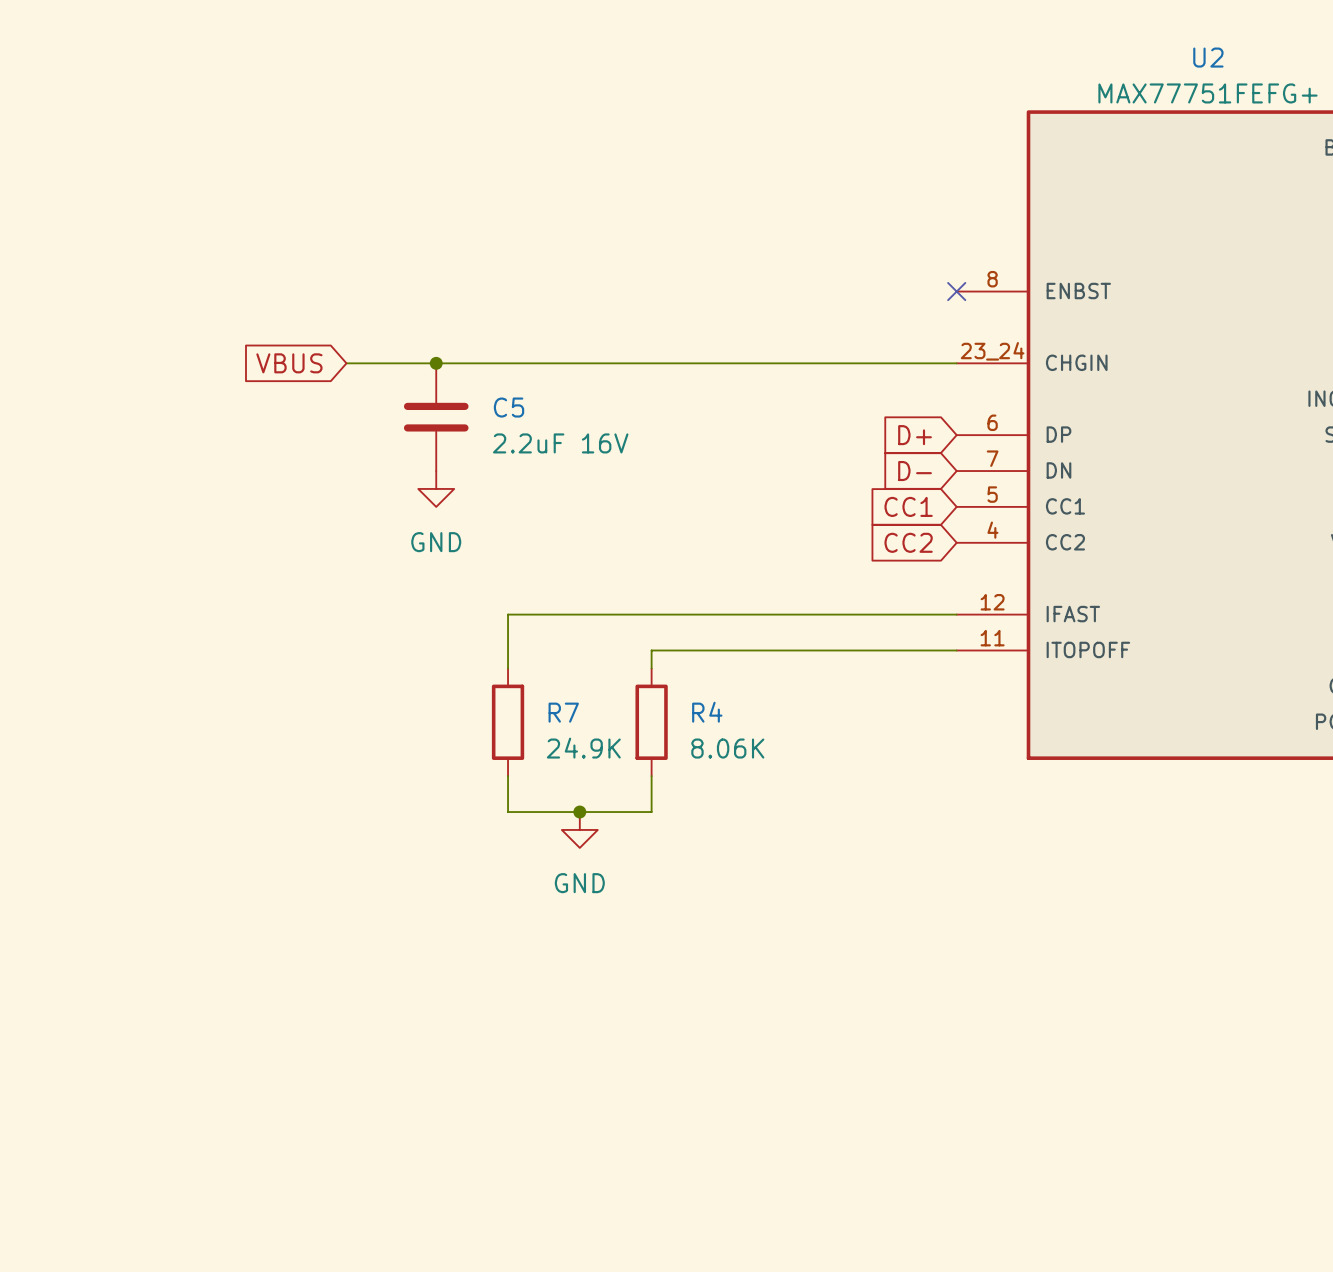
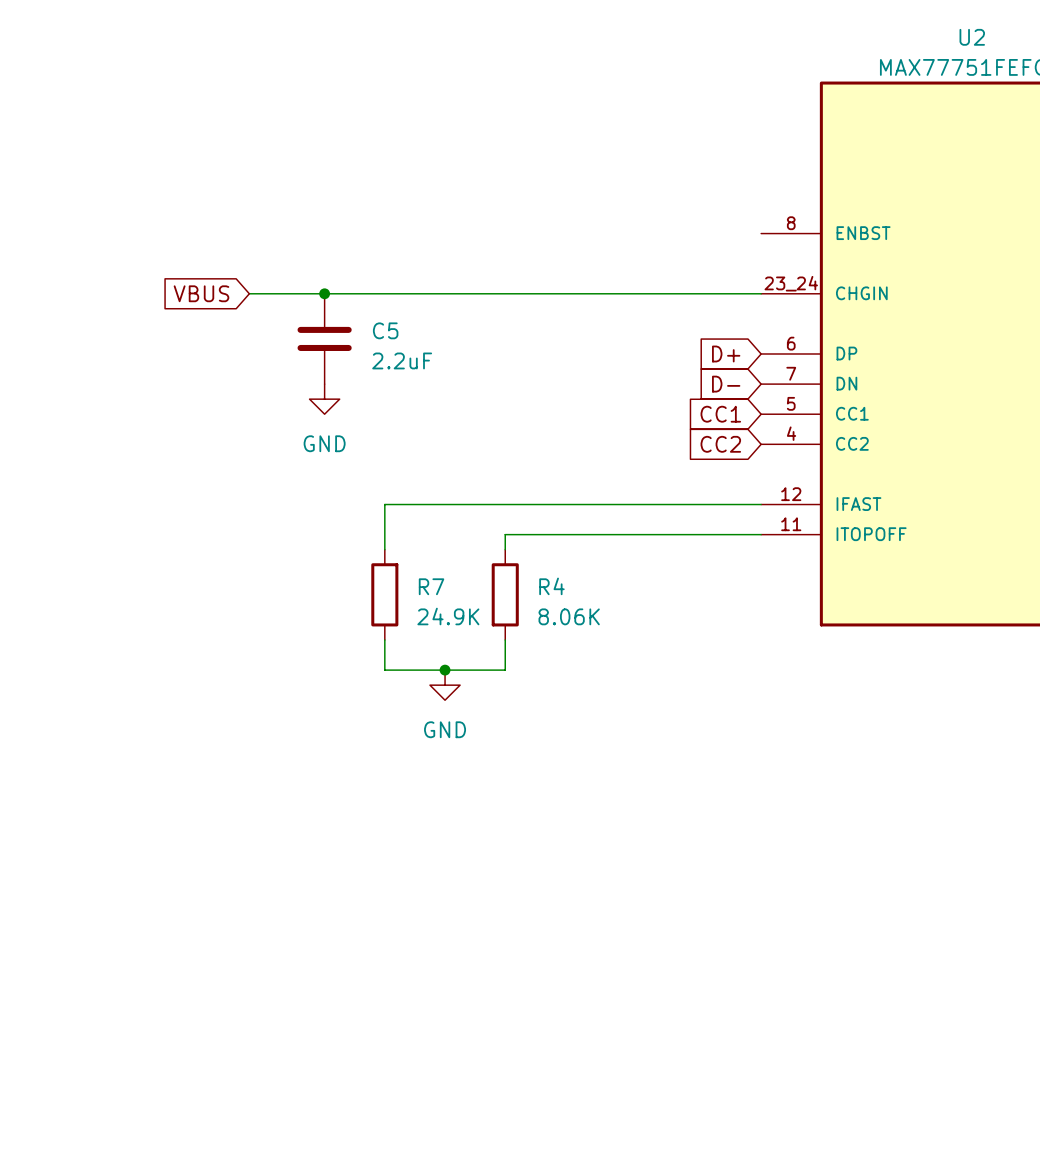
no-connect mark: (956, 291) -> none
C5 value: 2.2uF 16V (560, 443) -> 2.2uF (402, 360)

